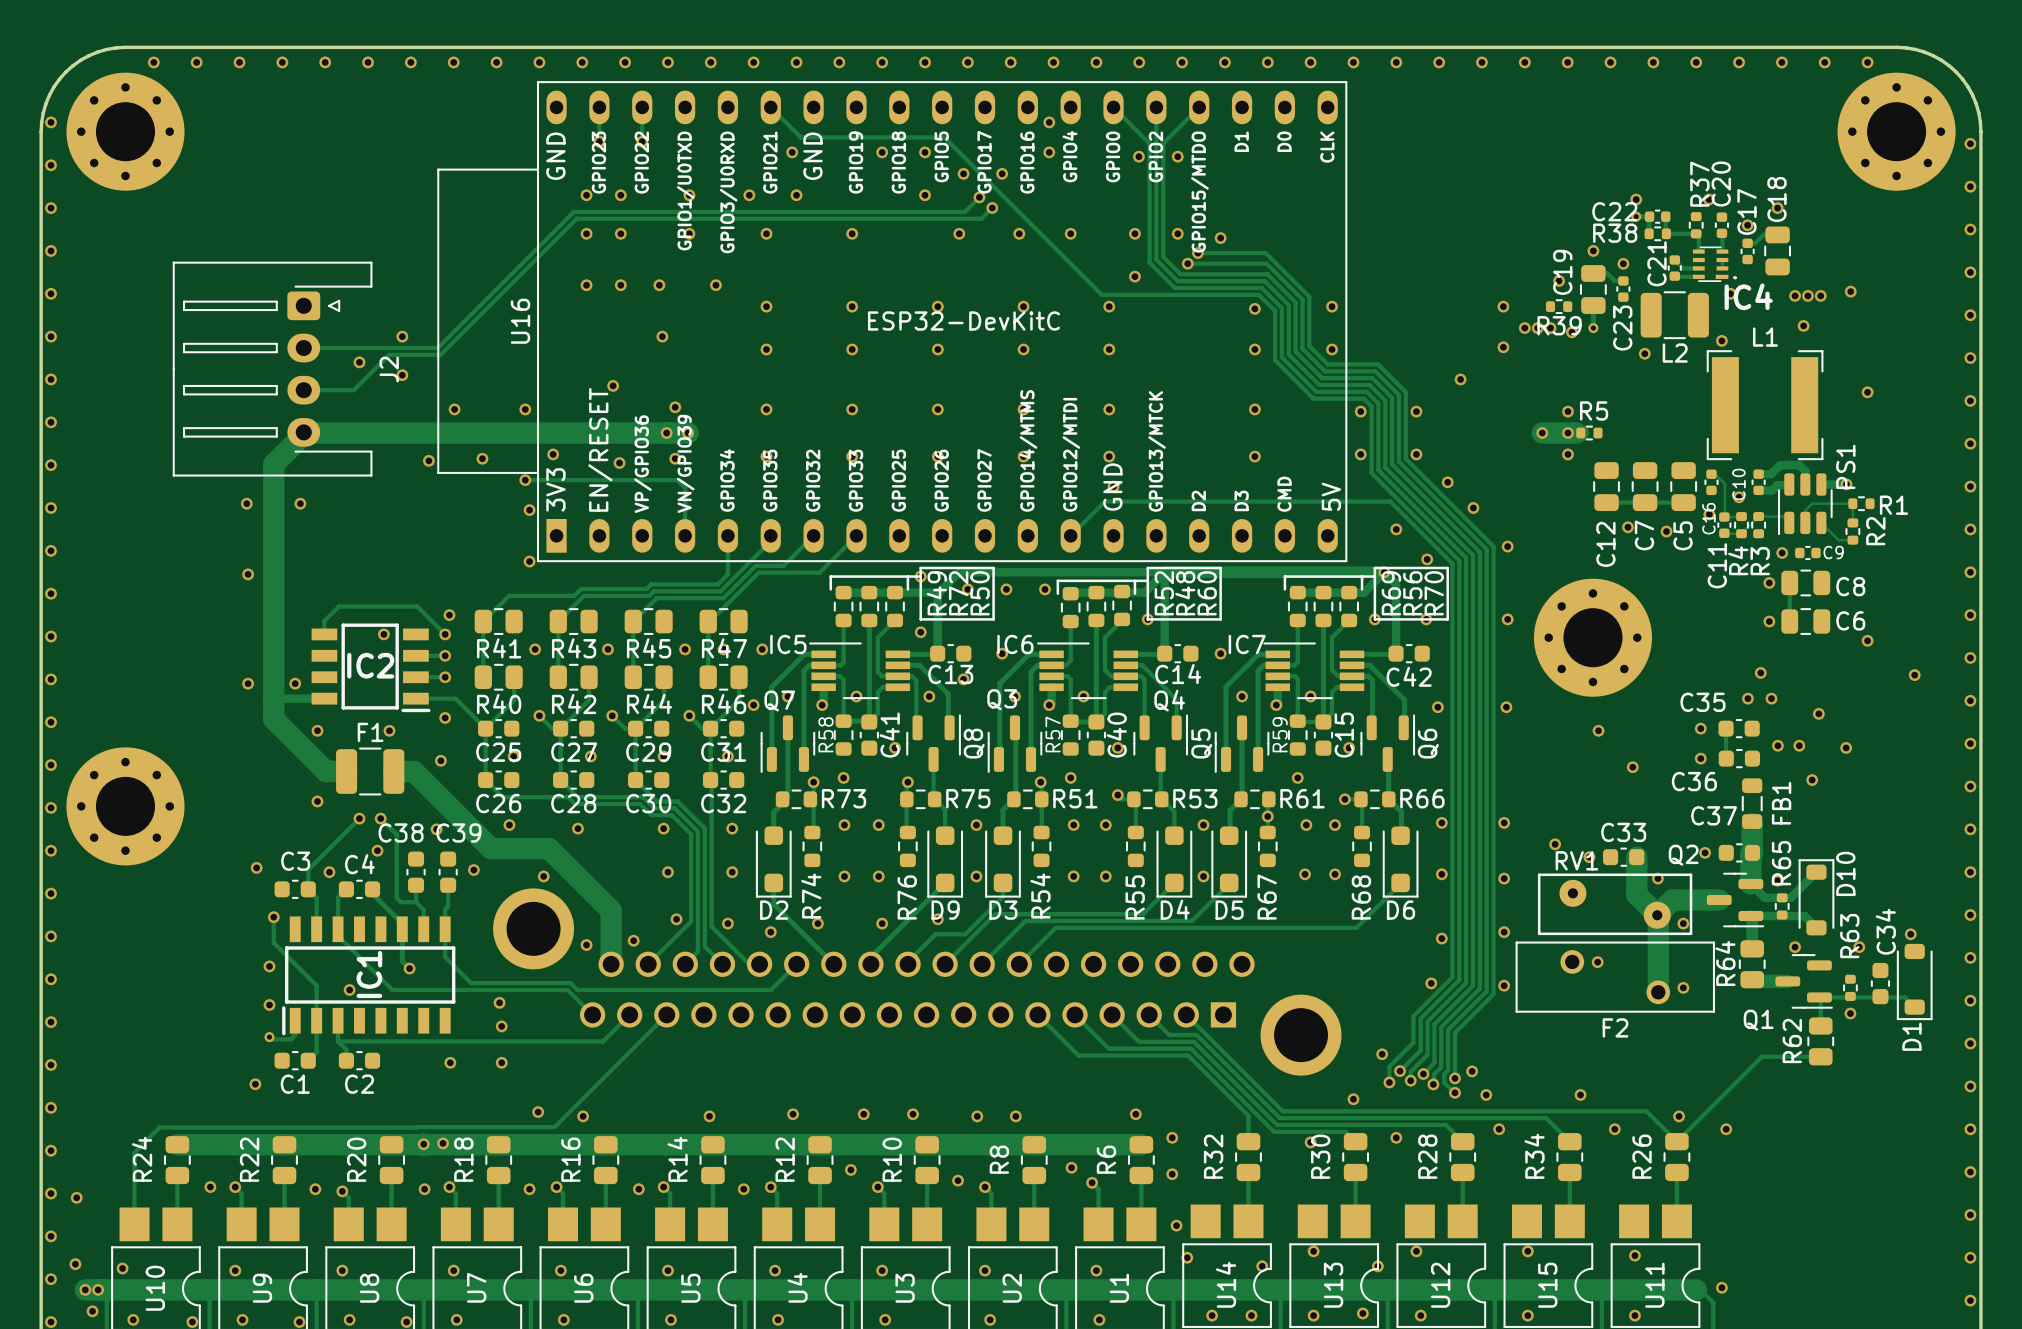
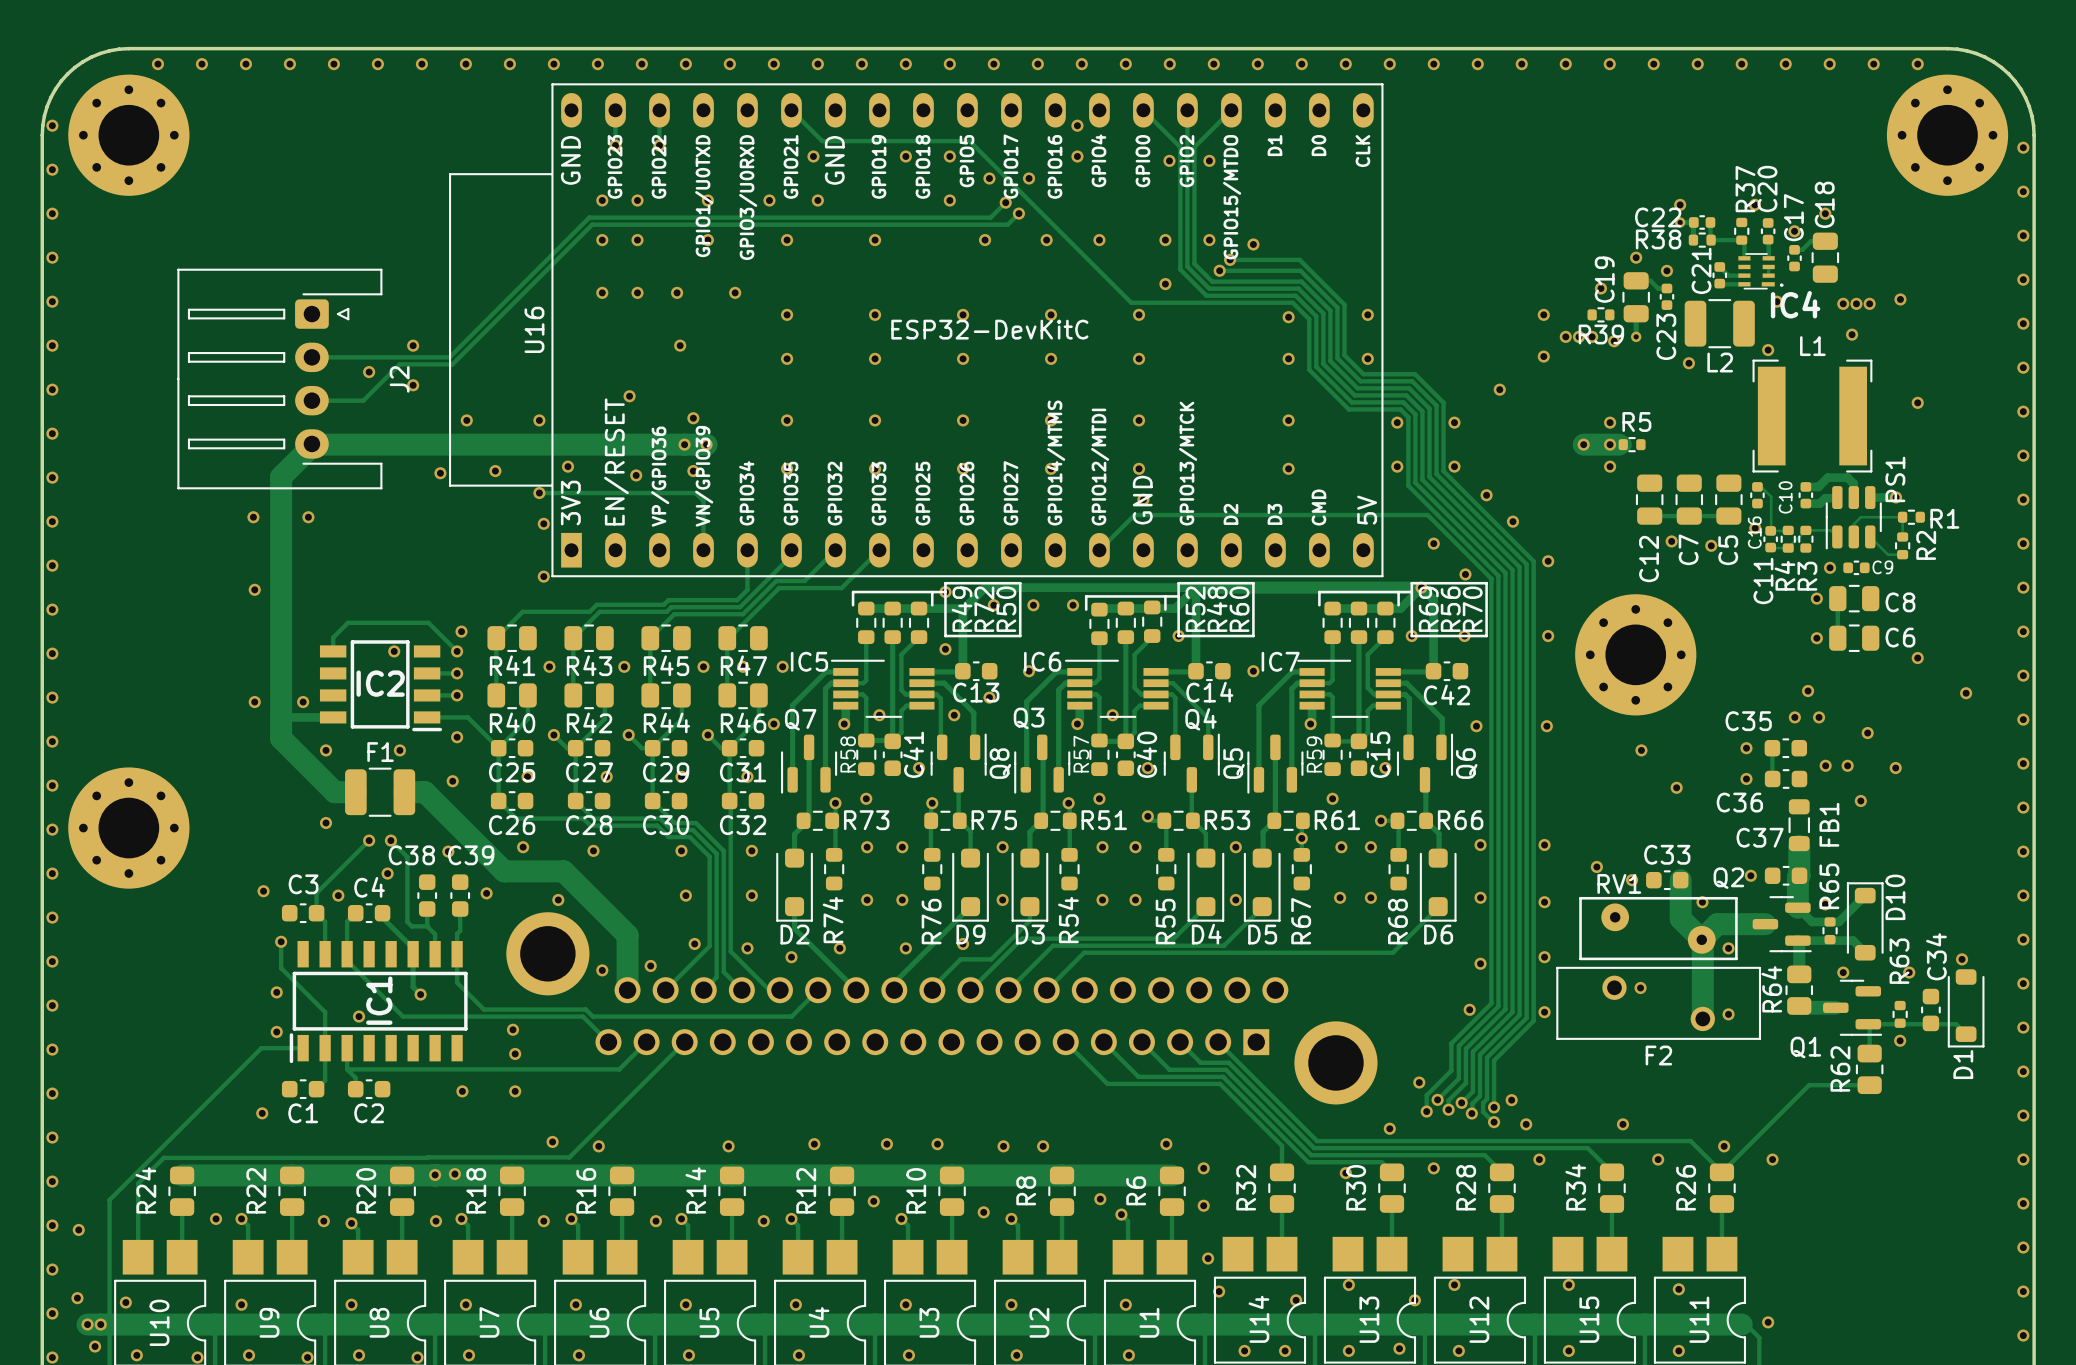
via: (1739, 497) -> none
via: (787, 696) -> none
via: (1014, 696) -> none
via: (1242, 696) -> none
via: (1310, 696) -> none
track: (295, 1020) (295, 1034) (290, 1039) (271, 1039) (269, 1037) -> (303, 1048) (261, 1048) (109, 1200) (109, 1324)
via: (269, 1037) -> none

